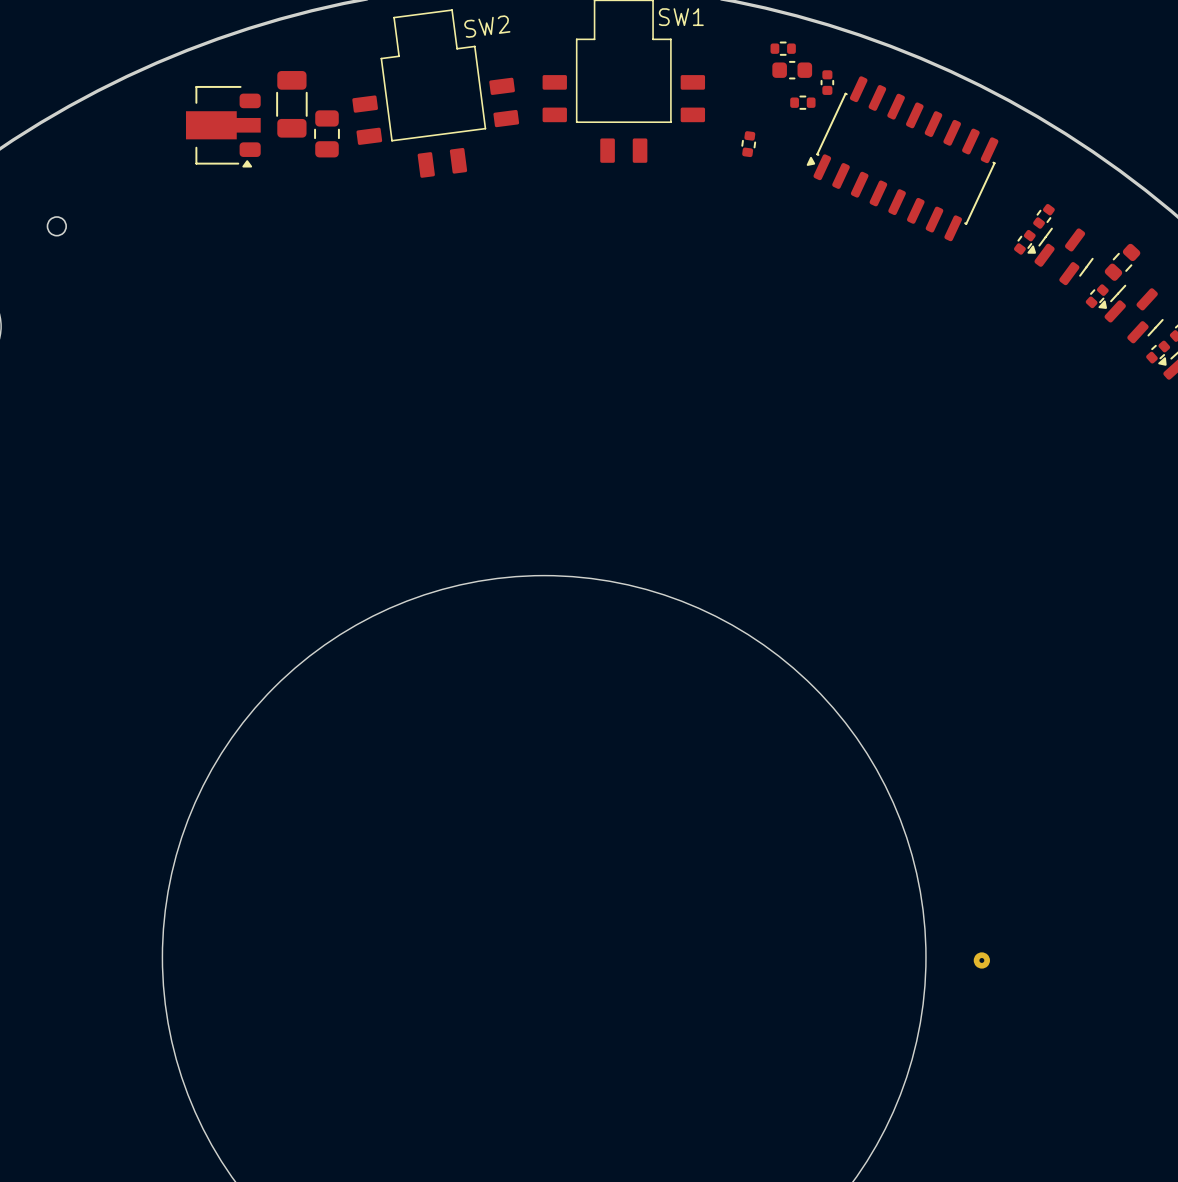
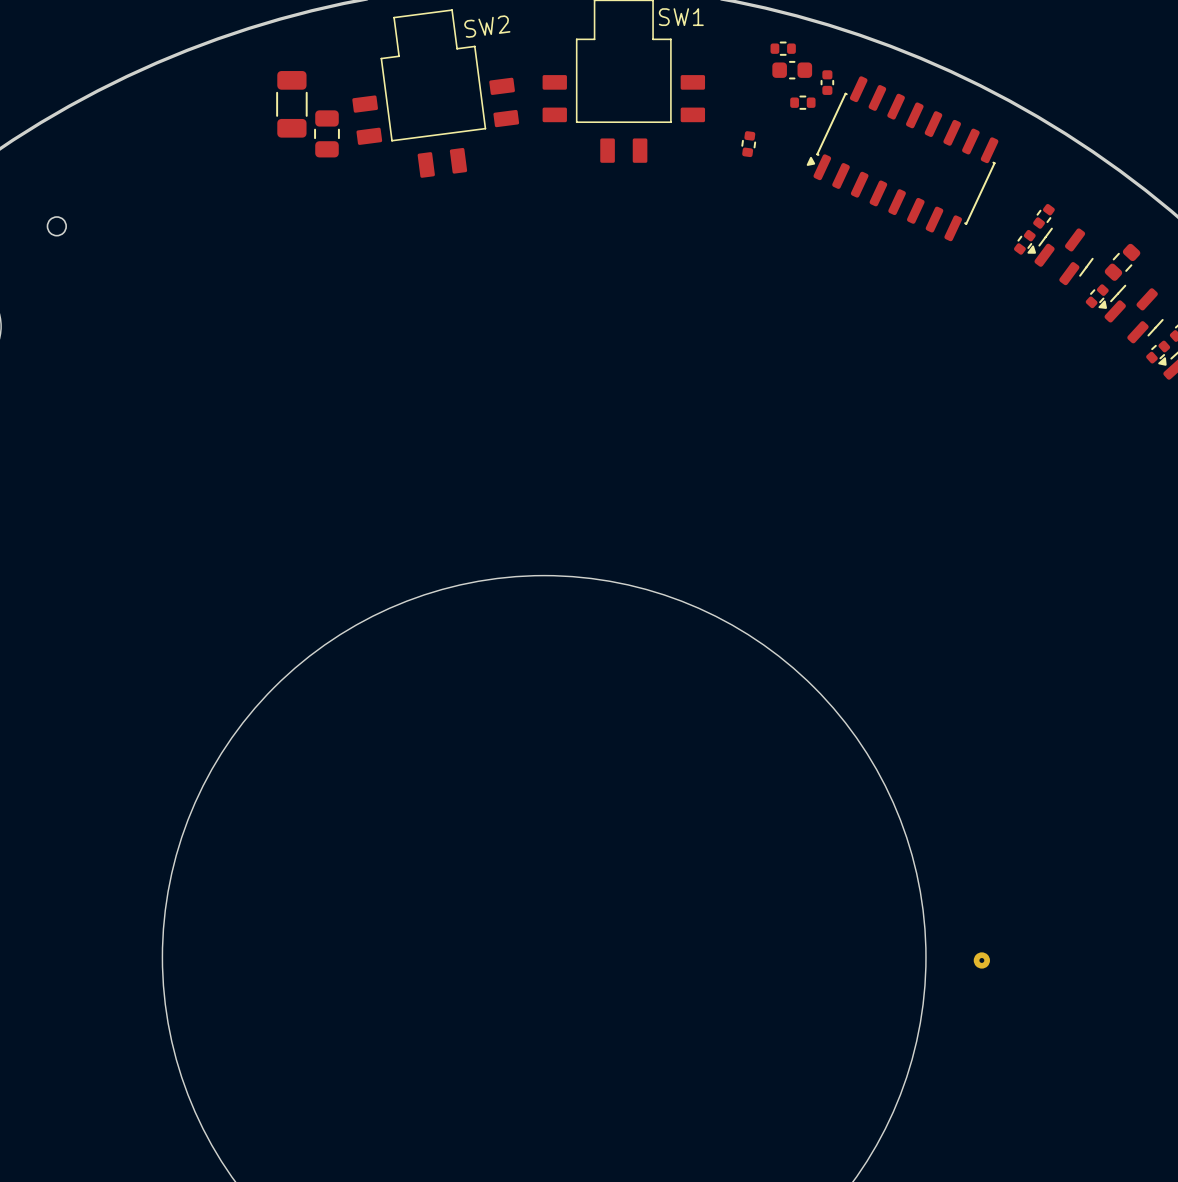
part: (223, 126) -> none

